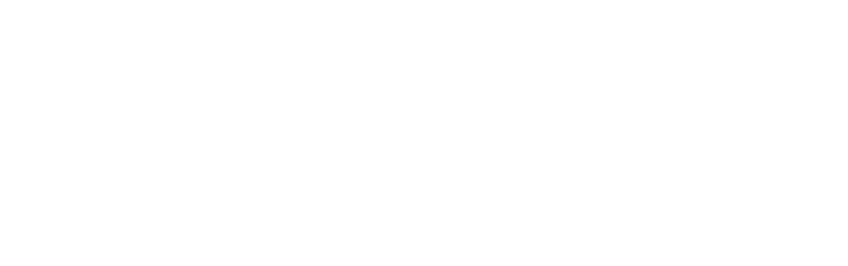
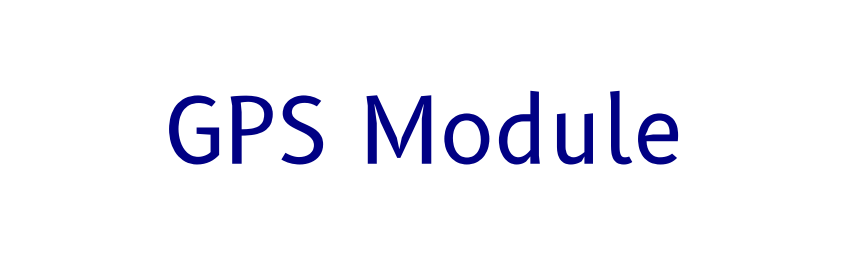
text: none -> GPS Module (423, 127)

